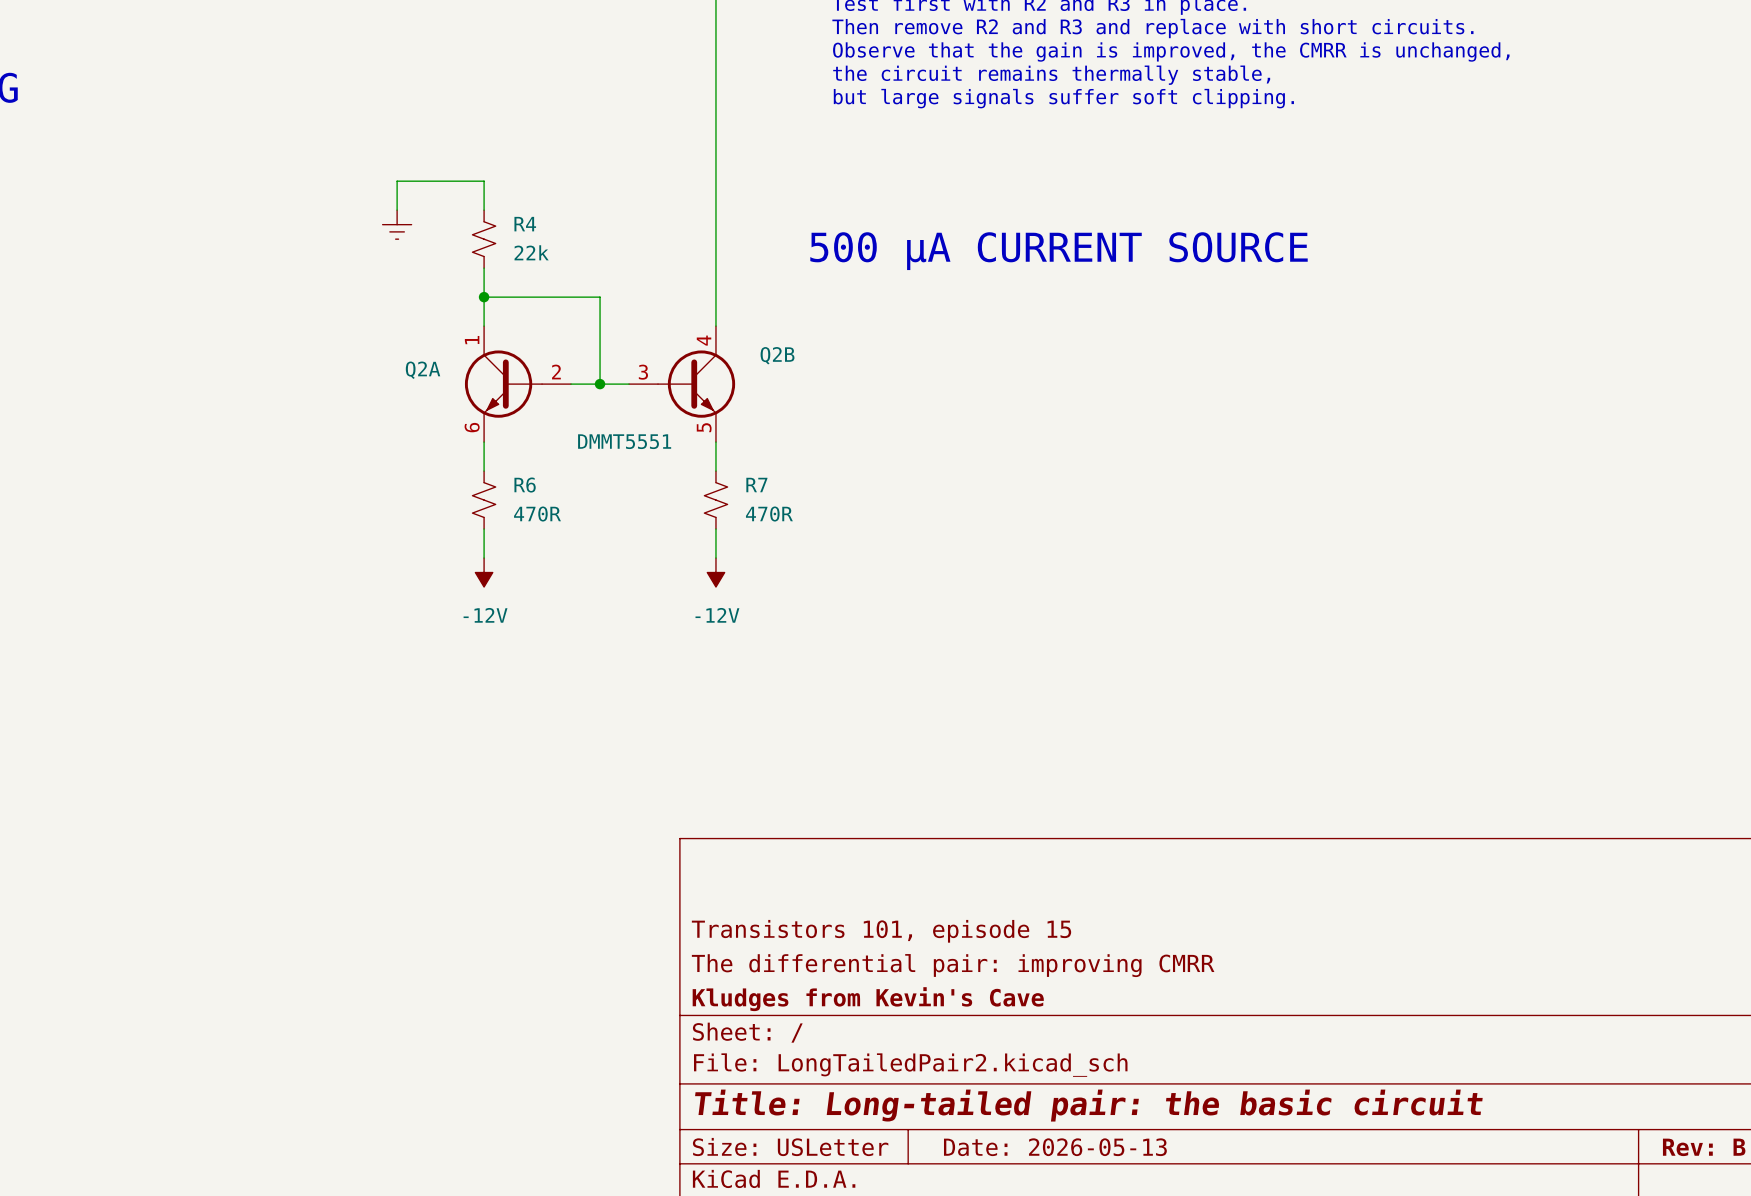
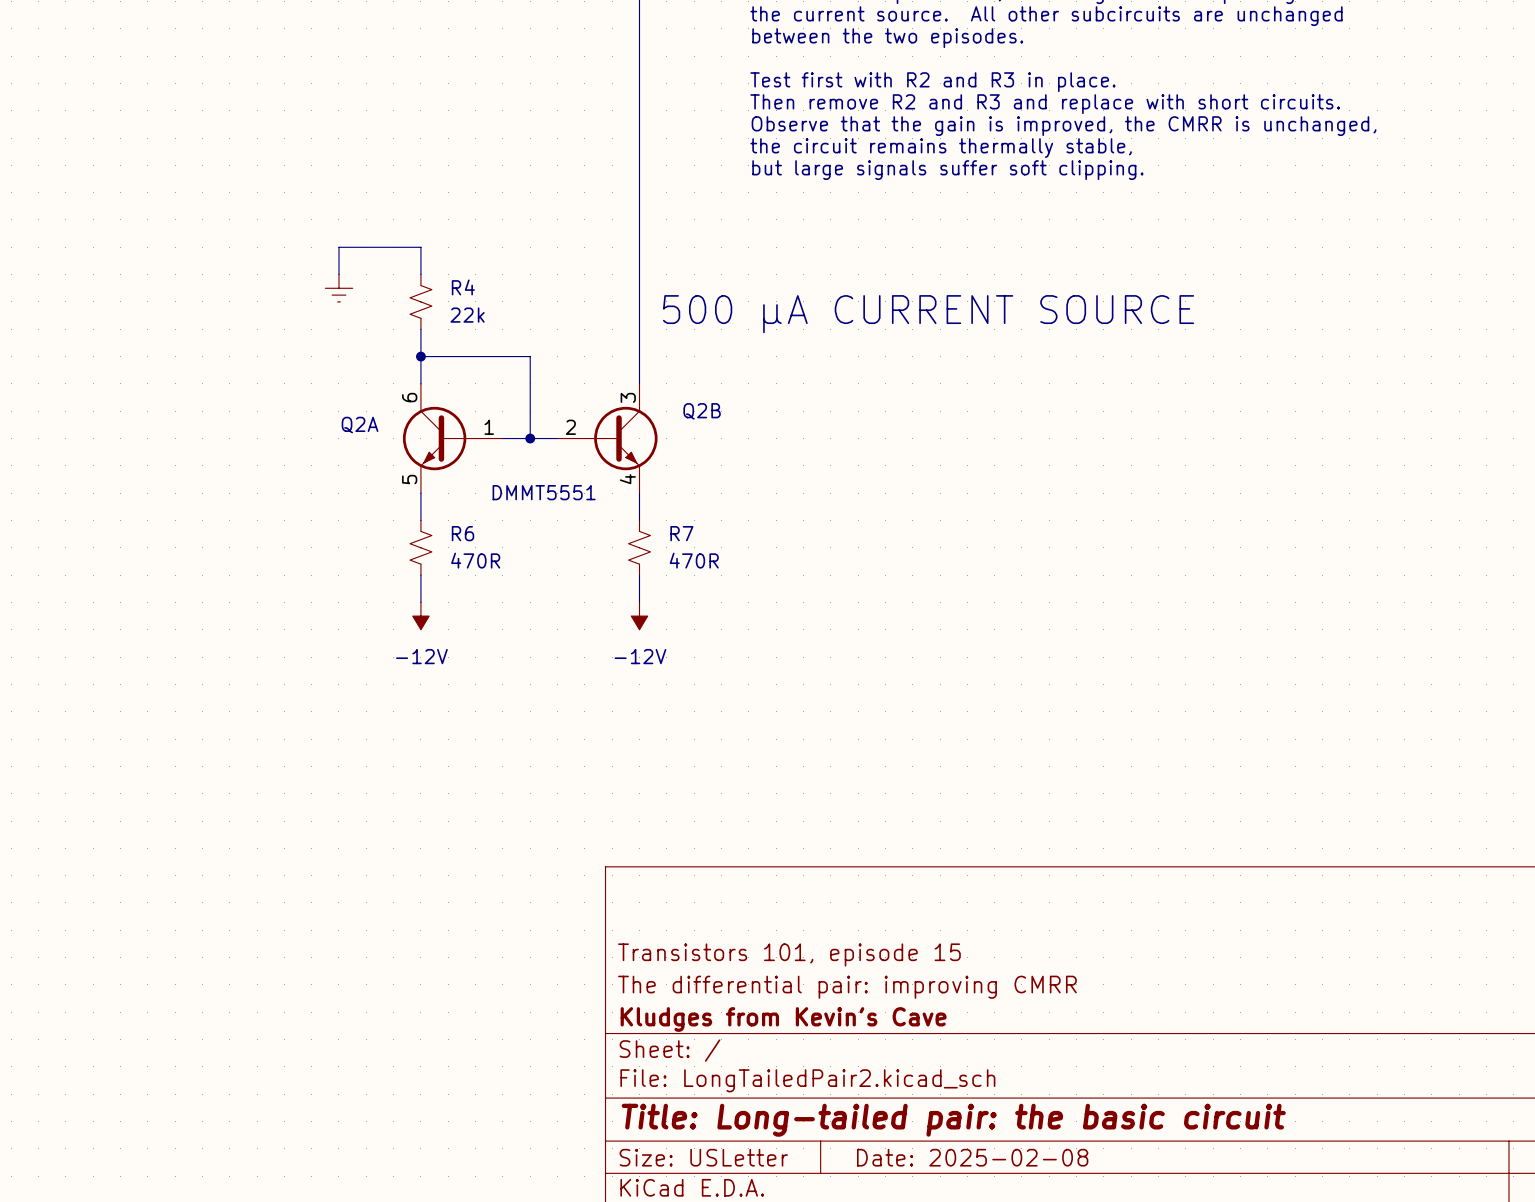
Q2A pin number: 1 (472, 340) -> 6 (409, 397)
Q2B pin number: 4 (704, 340) -> 3 (628, 397)
Q2A pin number: 2 (556, 372) -> 1 (489, 427)
Q2B pin number: 3 (643, 372) -> 2 (570, 427)
Q2A pin number: 6 (472, 427) -> 5 (409, 479)
Q2B pin number: 5 (704, 427) -> 4 (627, 479)
title block: Date: 2026-05-13 (1055, 1147) -> Date: 2025-02-08 (972, 1157)

